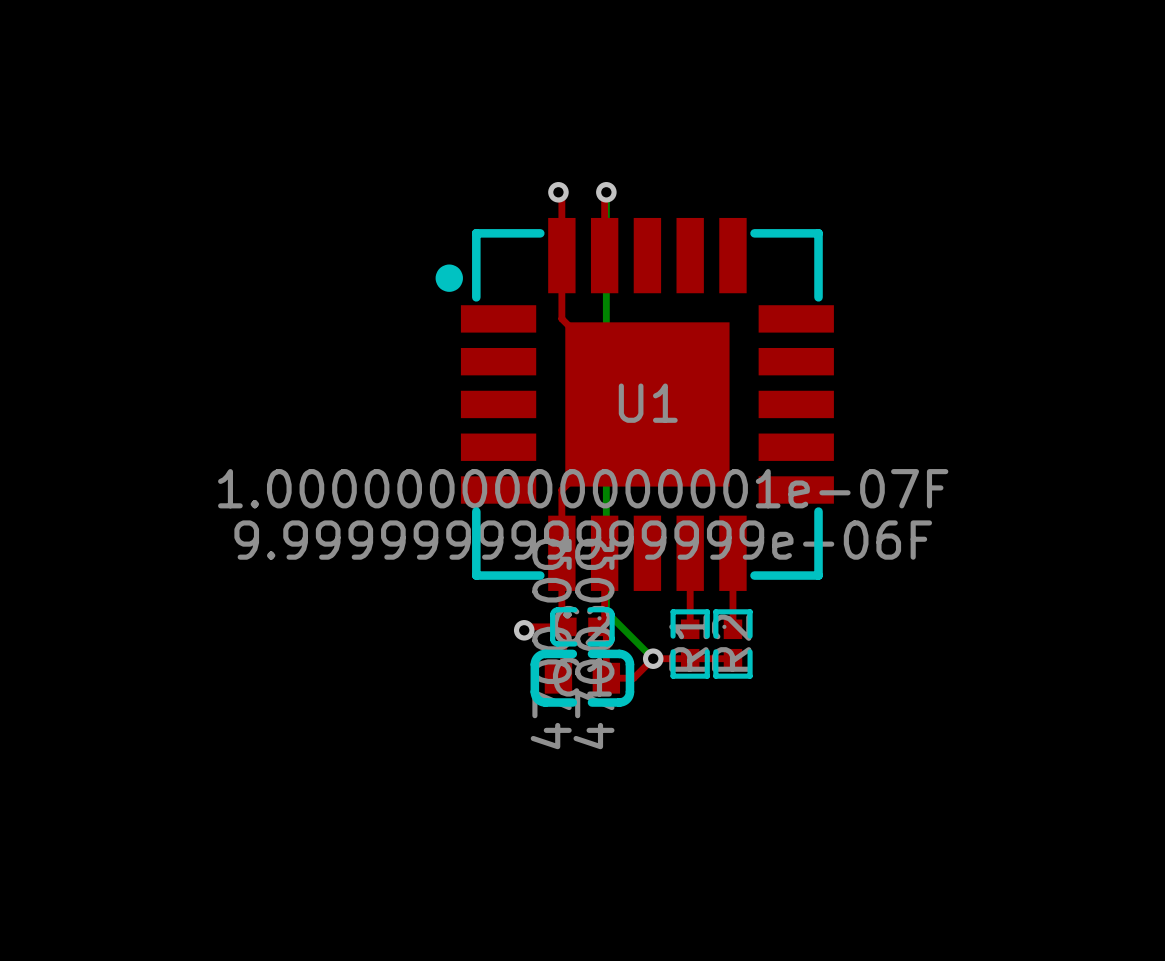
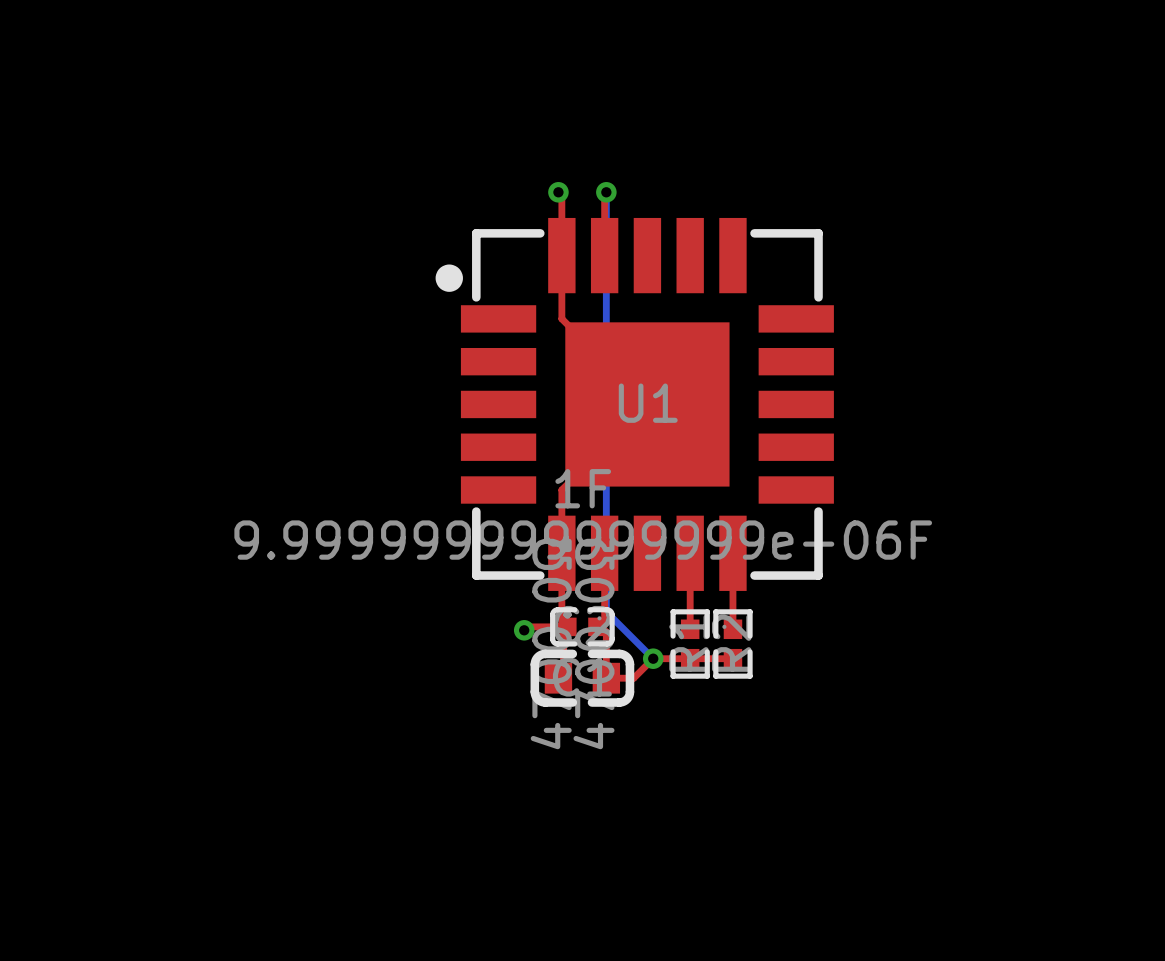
part value: 1.0000000000000001e-07F (583, 488) -> 1F (583, 488)

